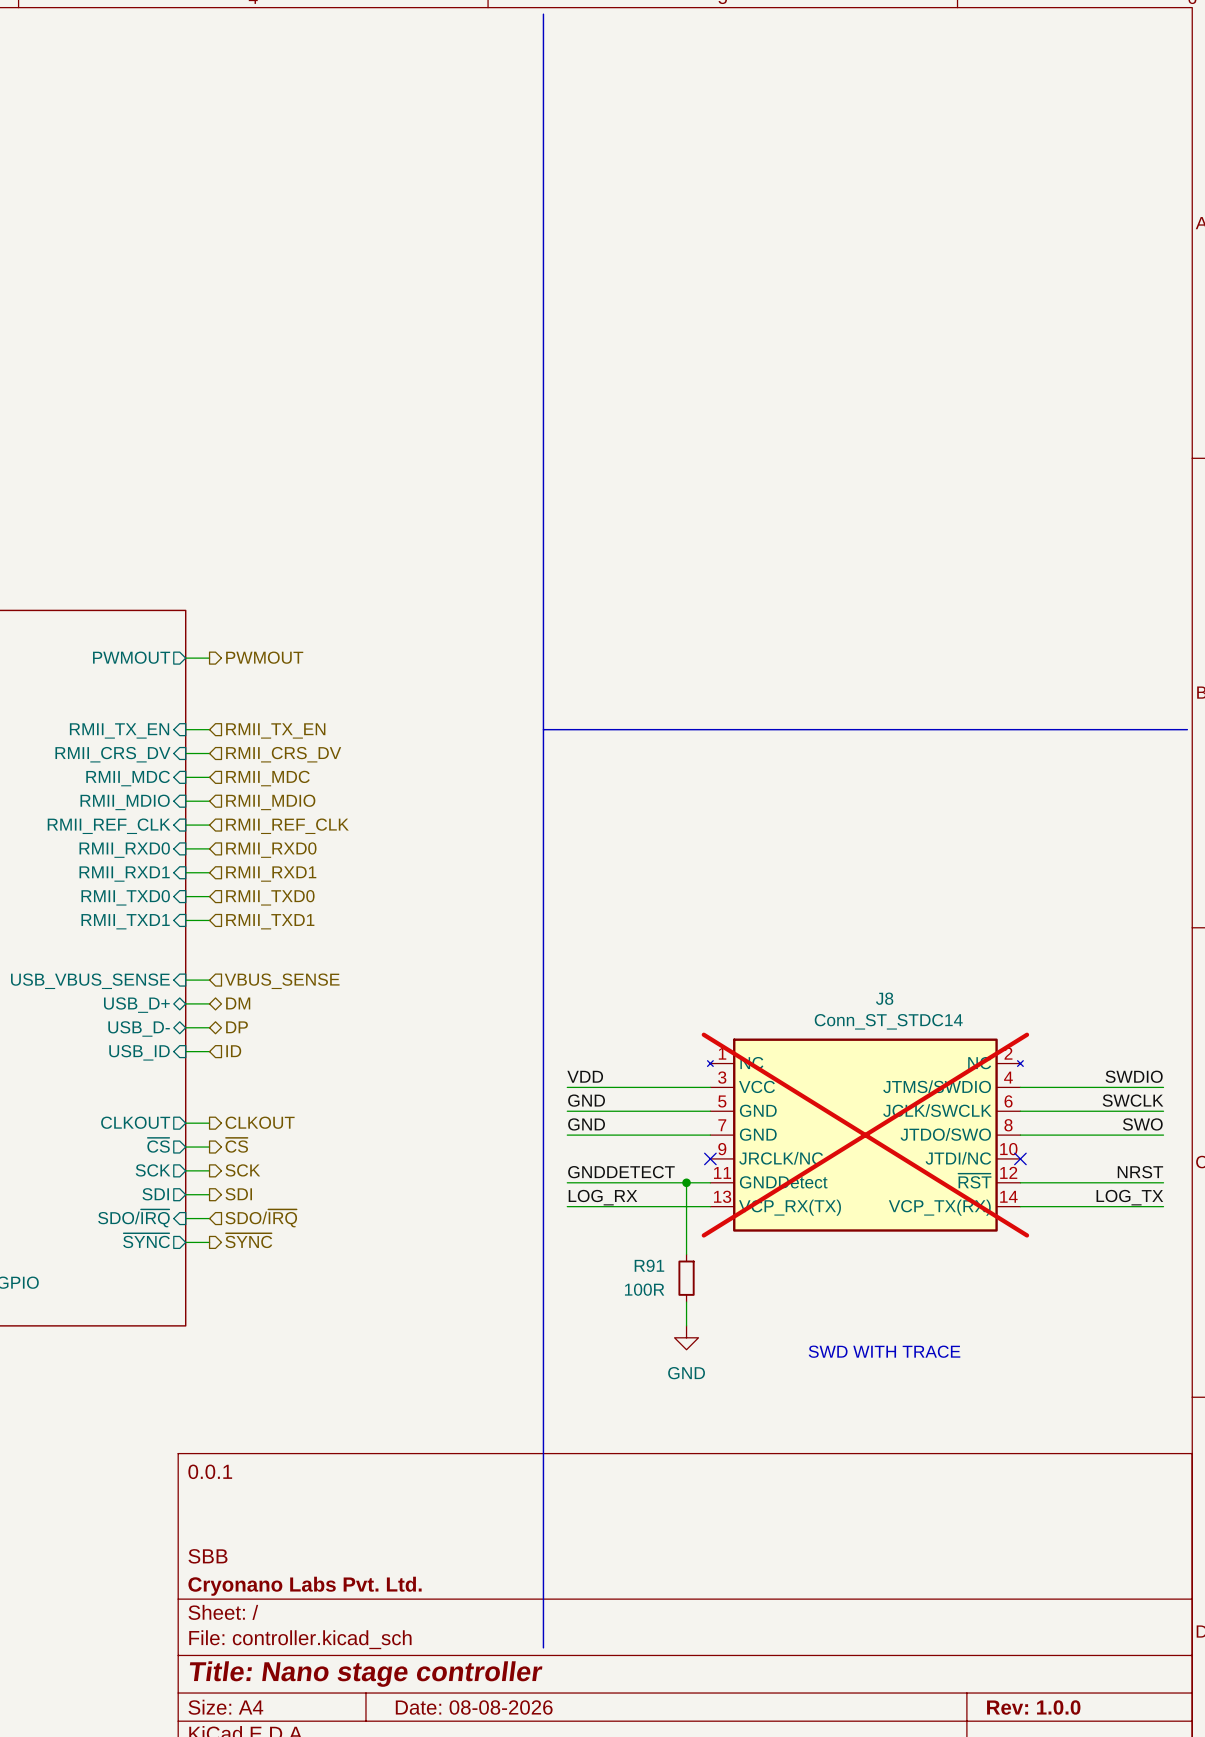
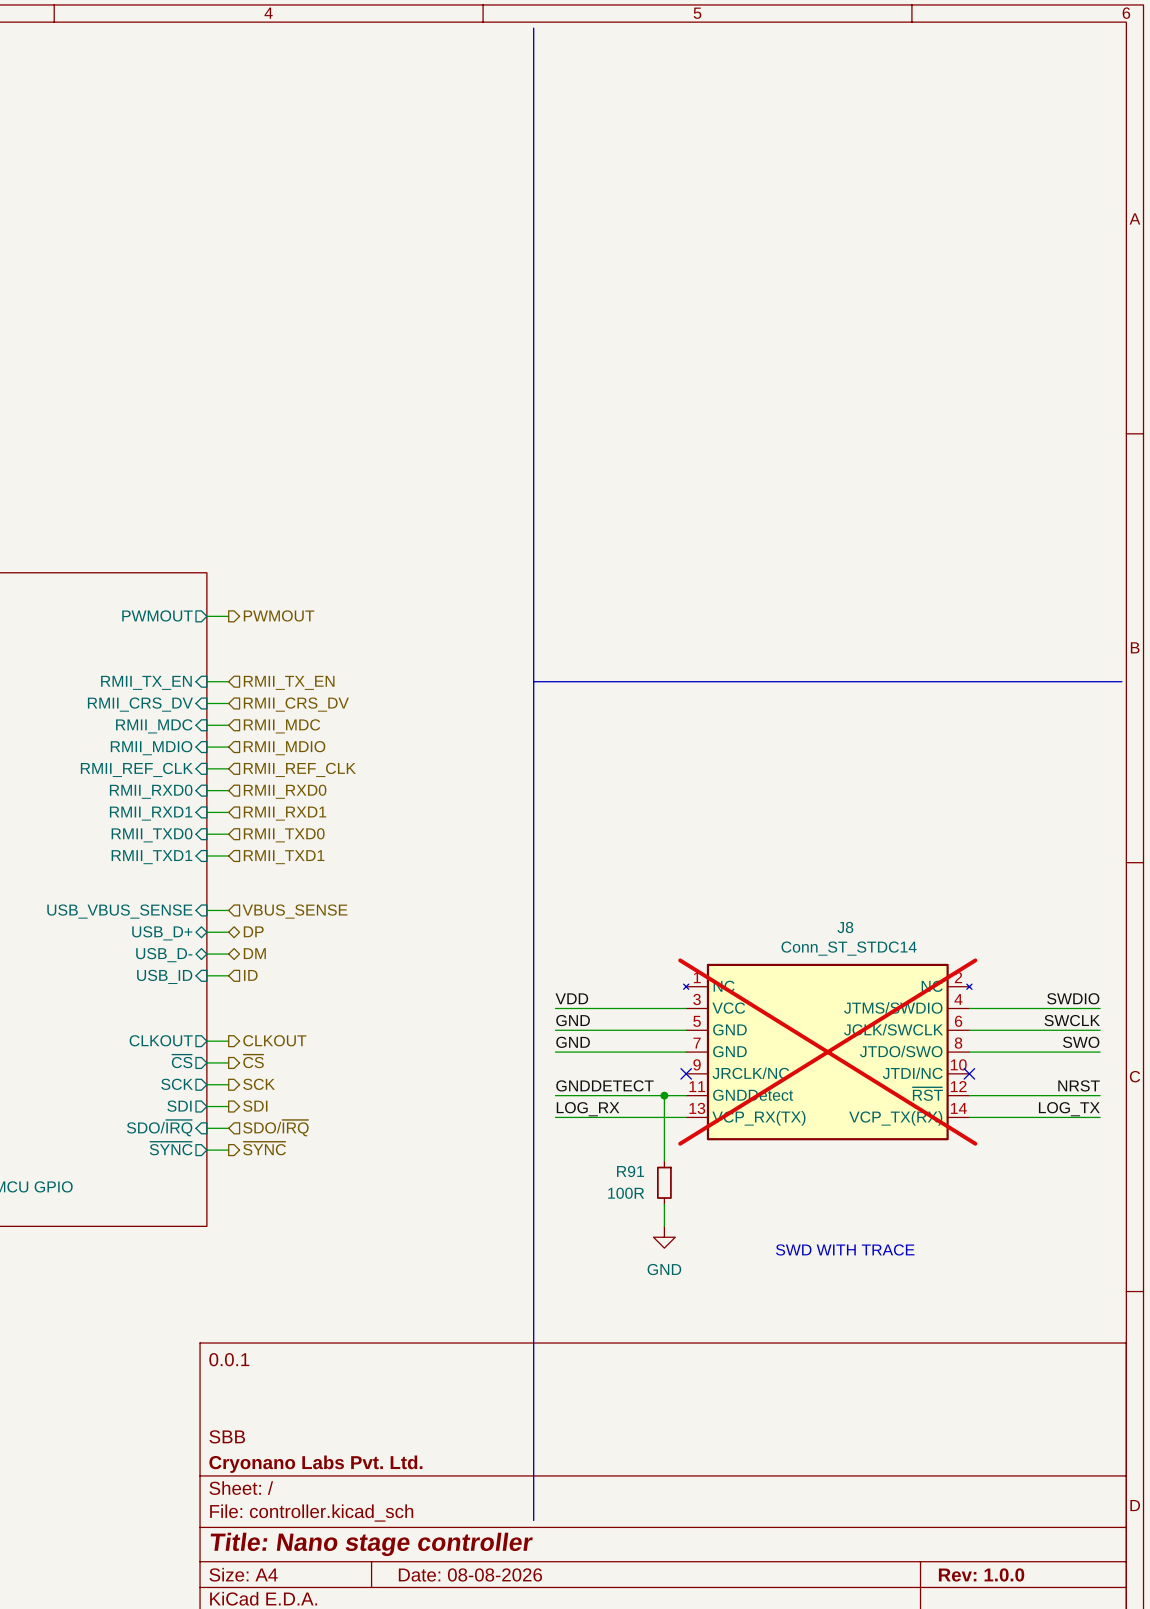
hierarchical label: DM (238, 1003) -> DP (253, 931)
hierarchical label: DP (236, 1027) -> DM (254, 953)

